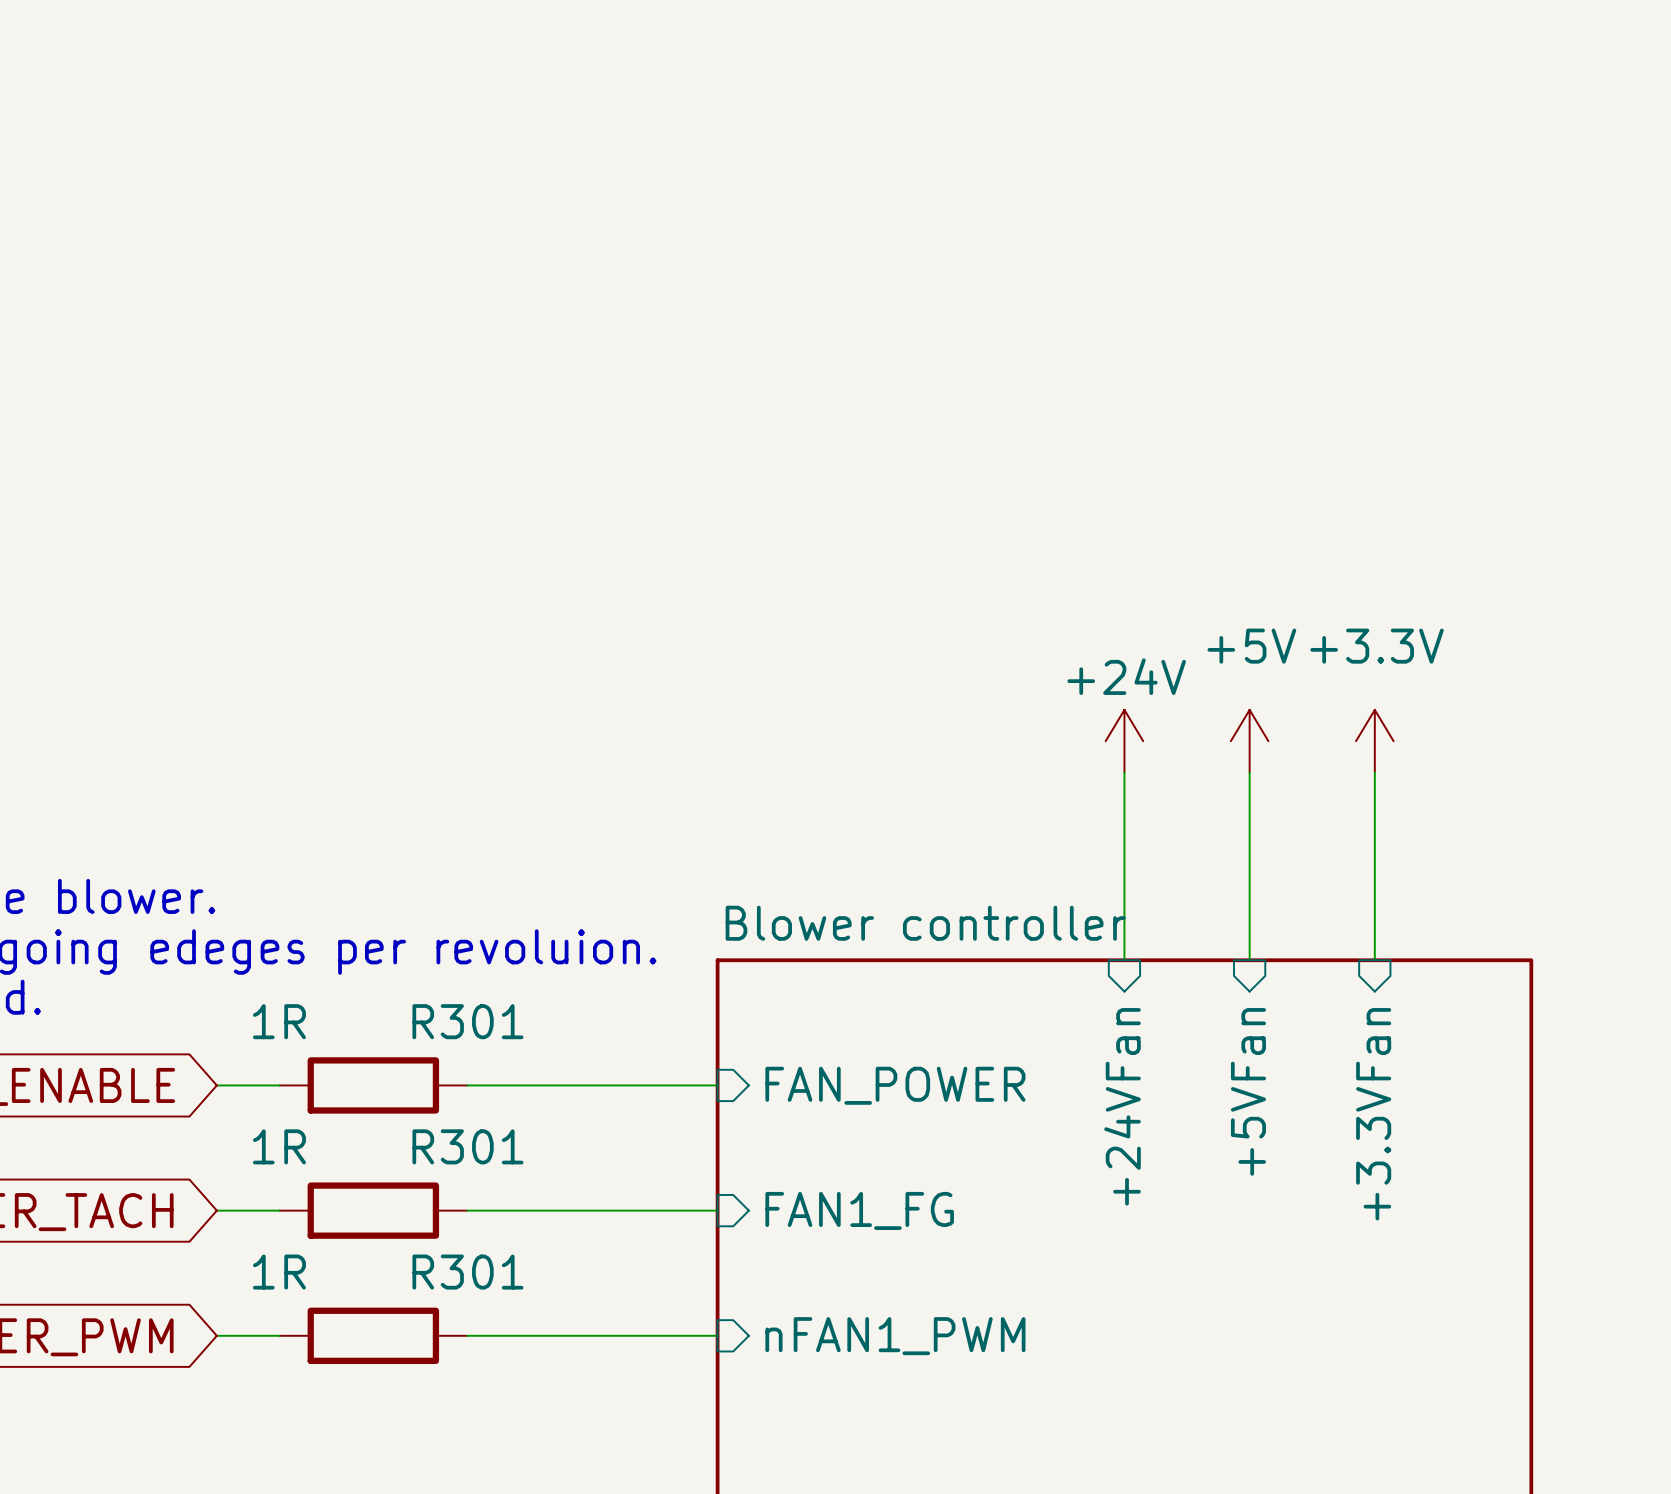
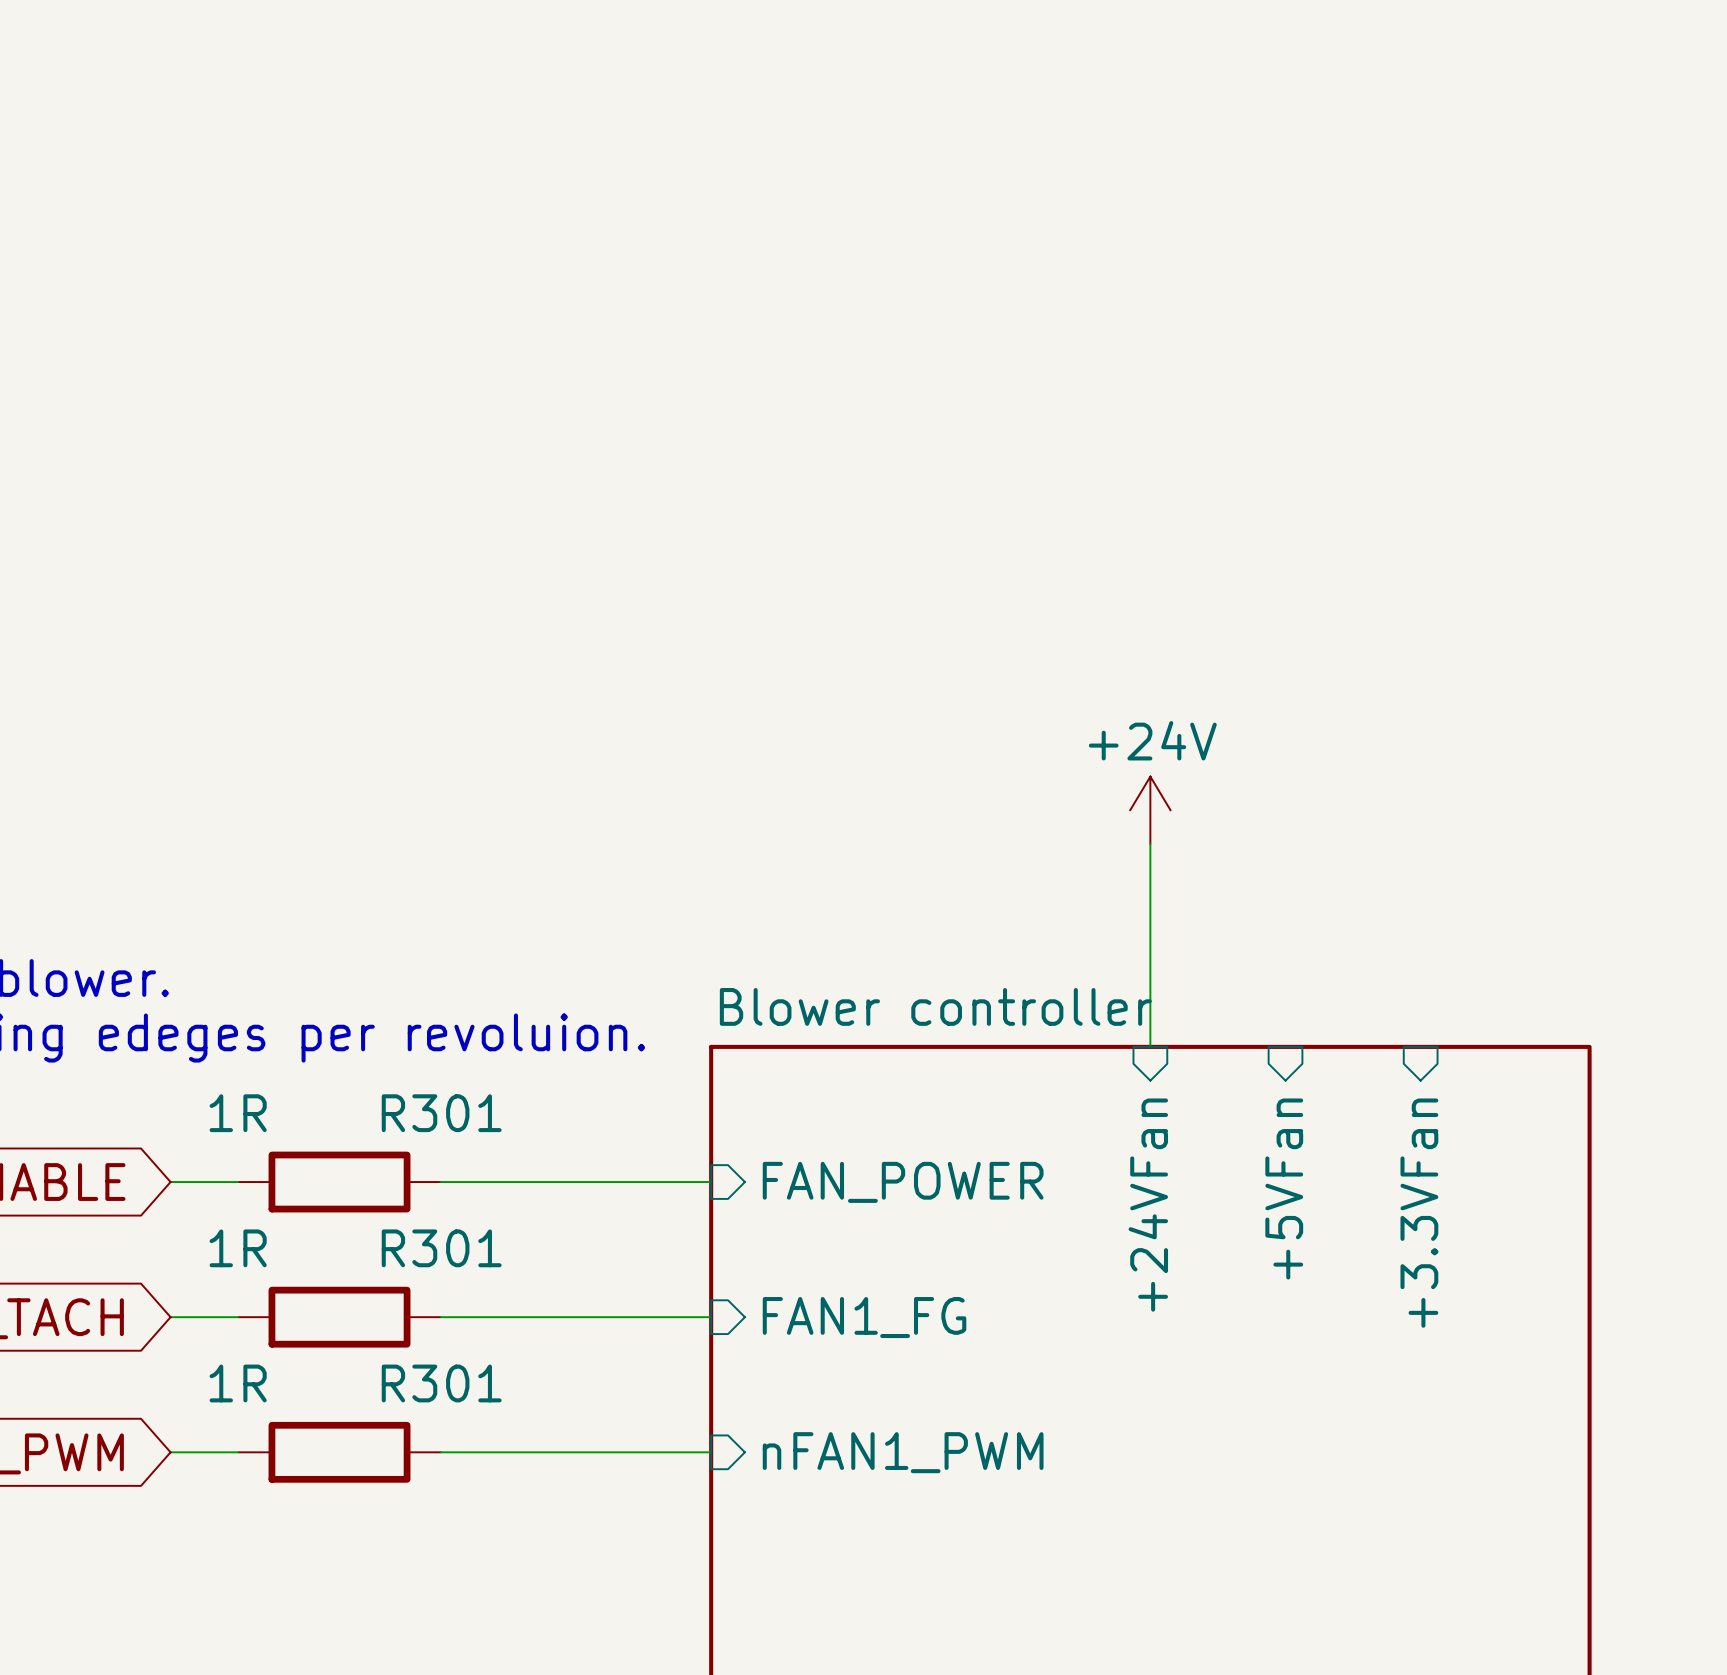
power symbol: +5V (1249, 741) -> none
power symbol: +3.3V (1374, 741) -> none
wire: (1249, 772) (1249, 960) -> none
wire: (1374, 772) (1374, 960) -> none

